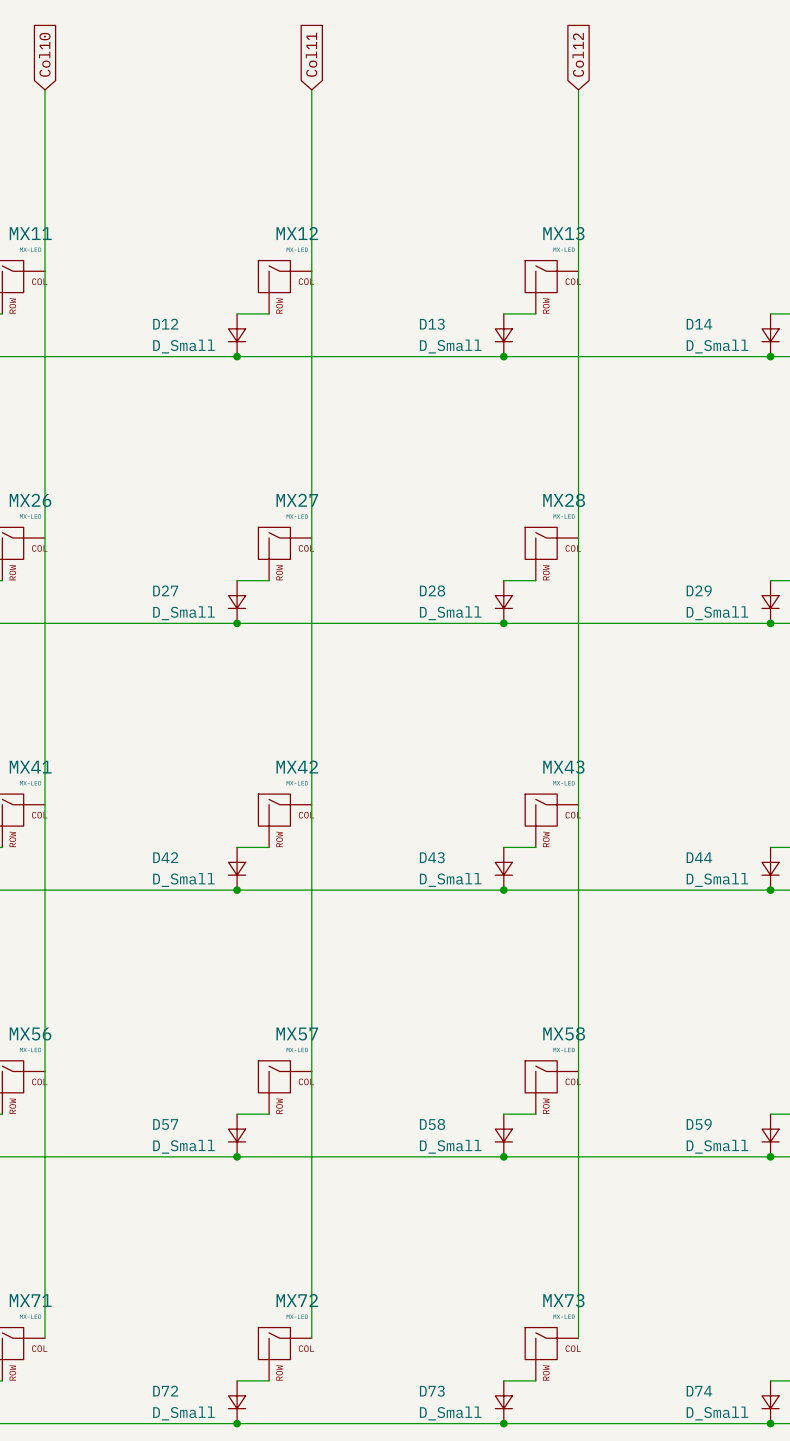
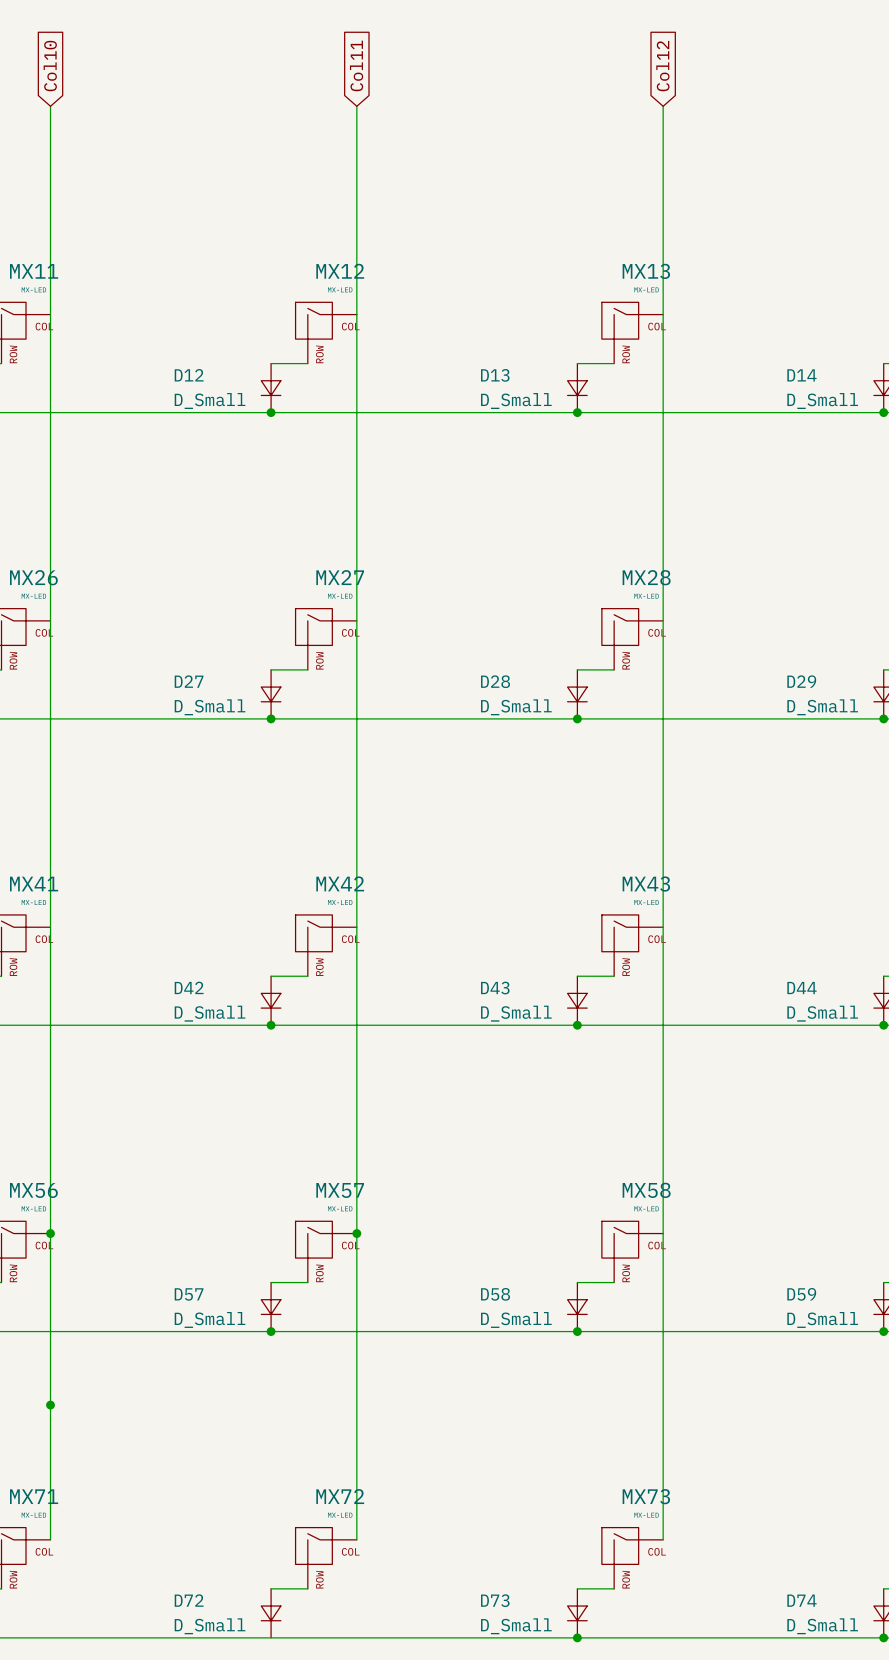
junction: none -> (50, 1233)
junction: none -> (356, 1233)
junction: none -> (50, 1405)
junction: (237, 1423) -> none

